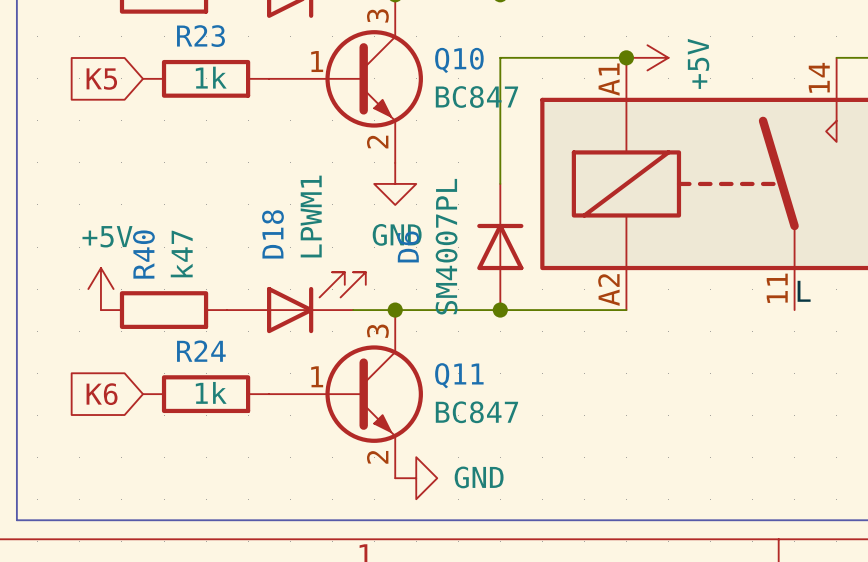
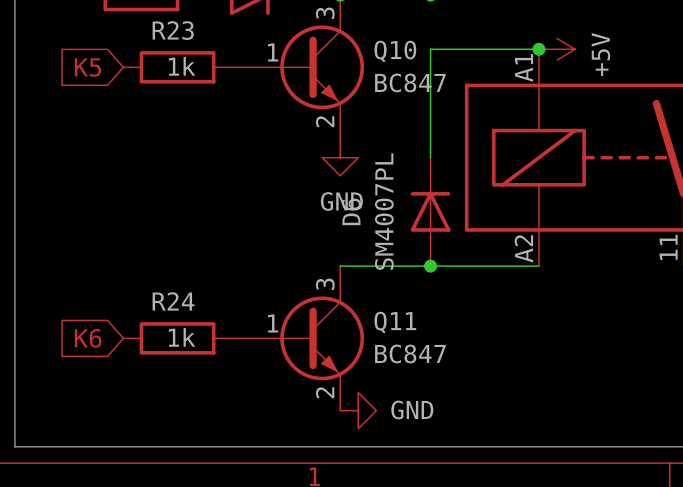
power symbol: +5V (100, 289) -> none
D18: LPWM1 (296, 302) -> none
R40: k47 (164, 310) -> none
wire: (353, 310) (395, 310) -> none
junction: (395, 310) -> none

